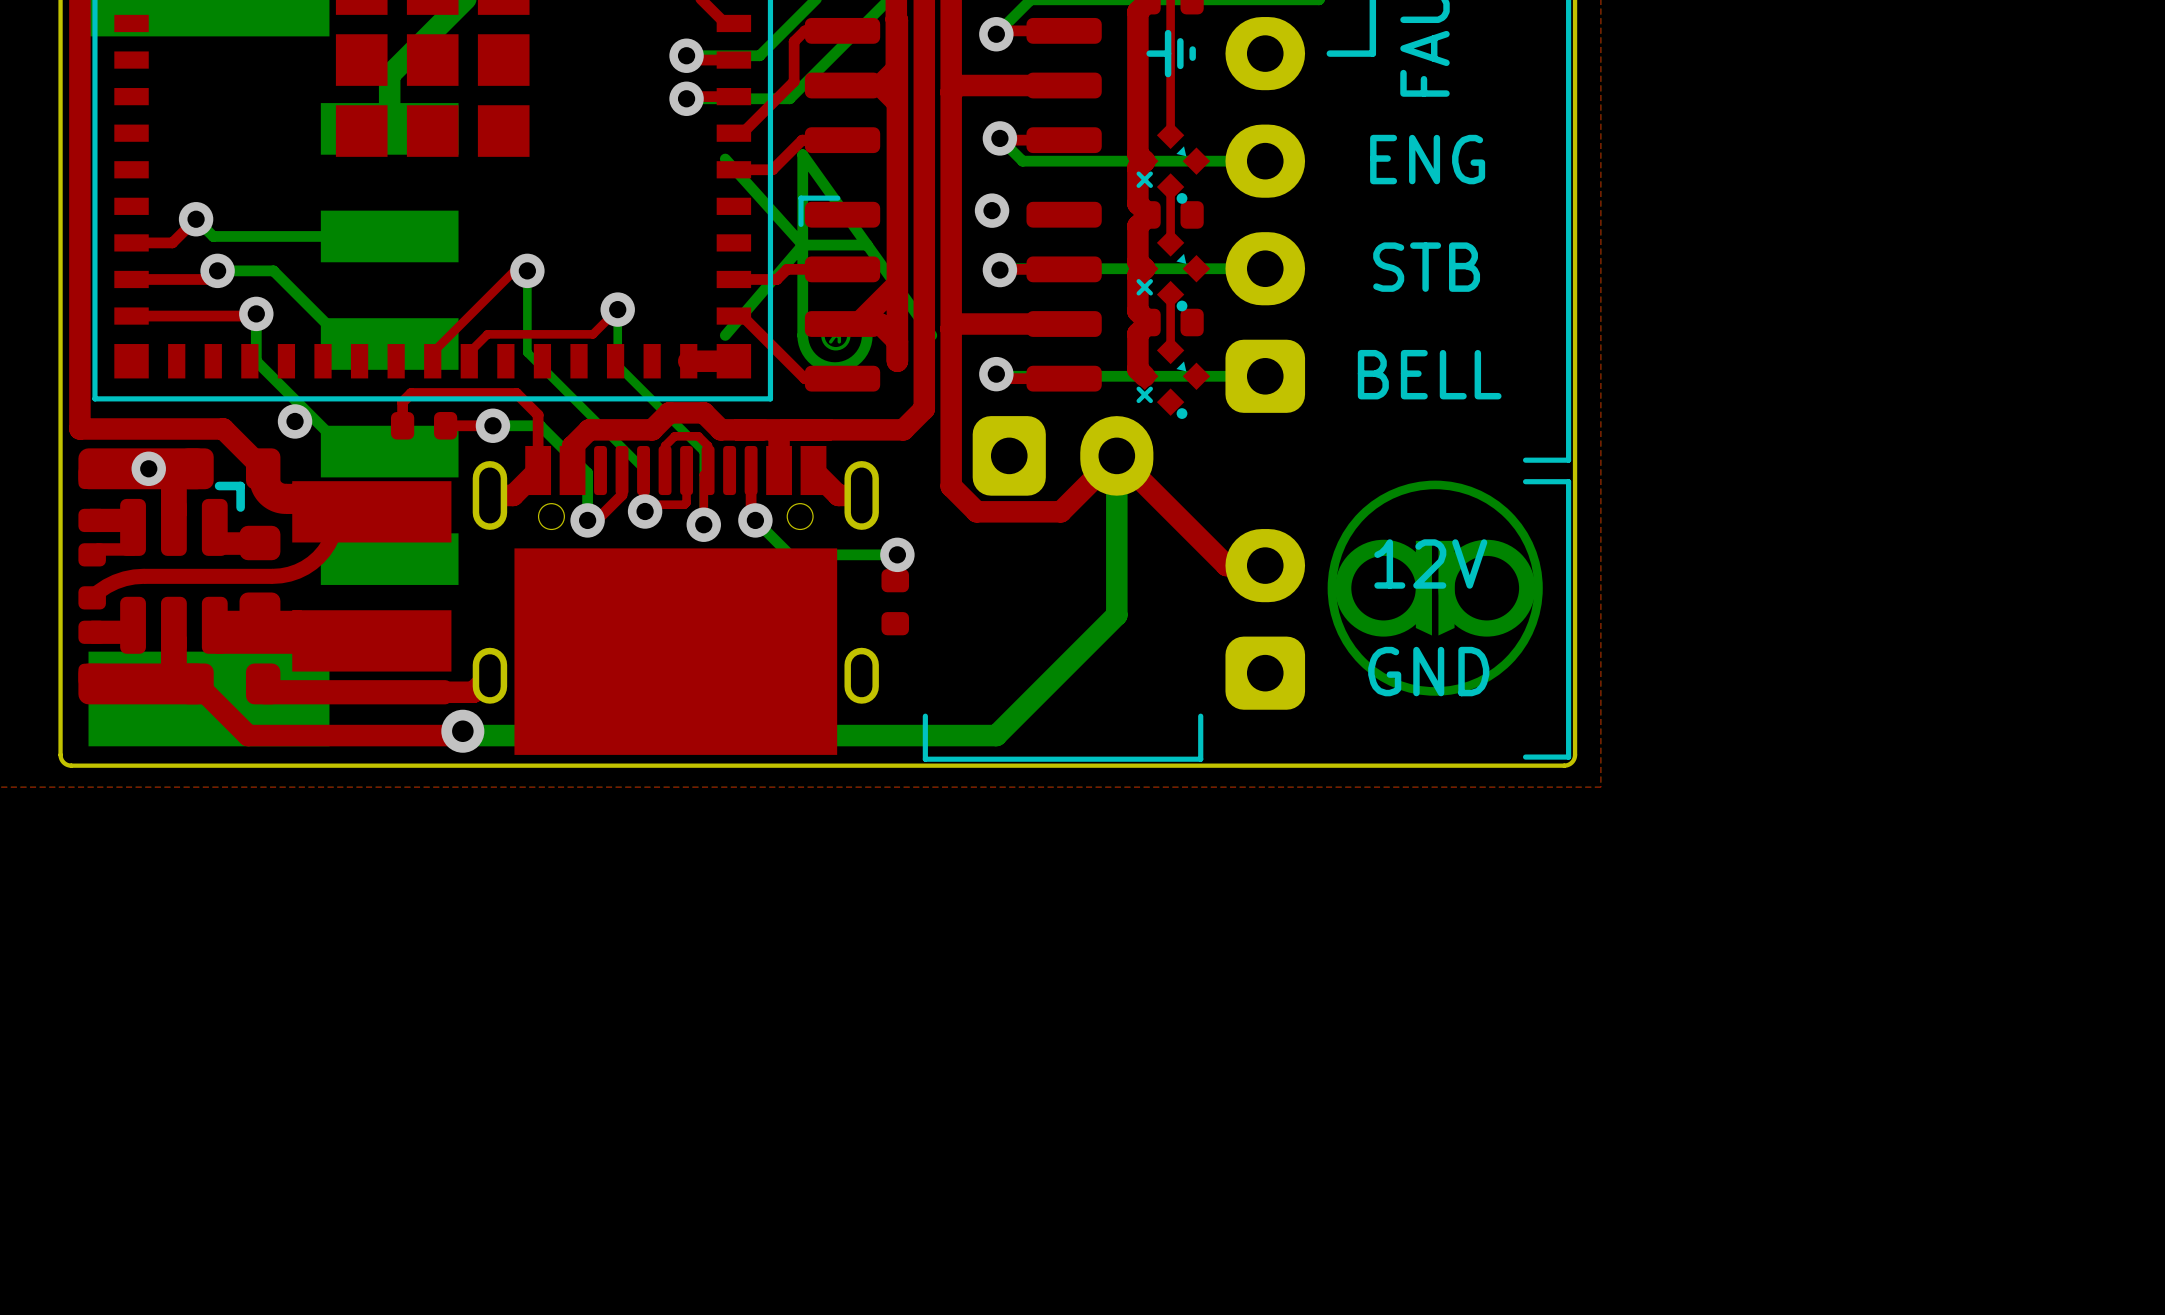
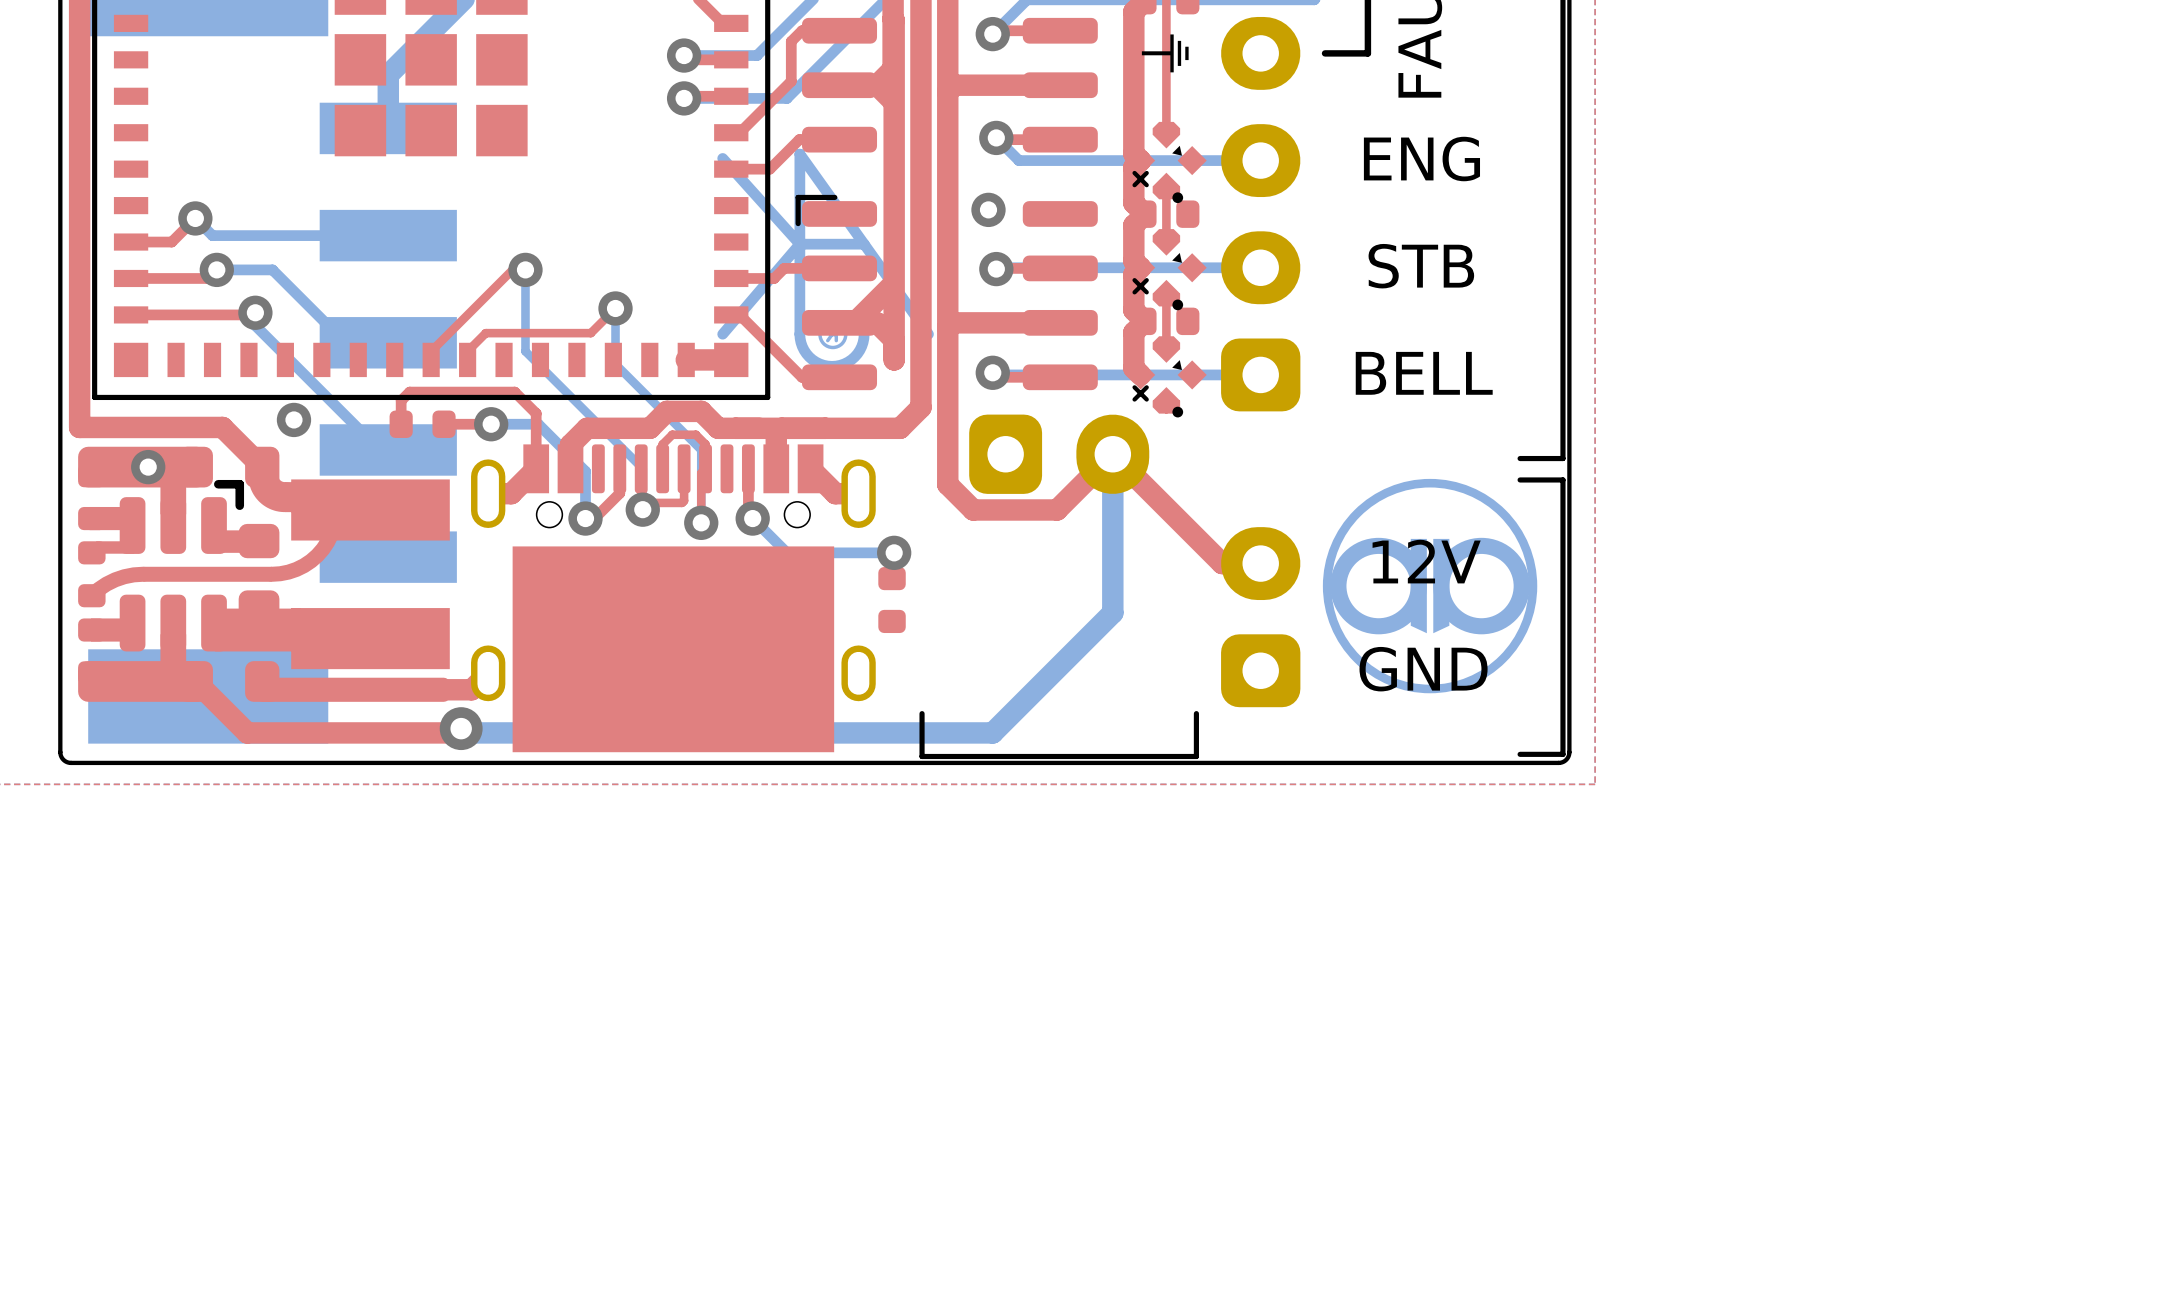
part footprint: [1131, 121, 1211, 204] -> [1126, 121, 1207, 204]
part footprint: [1131, 229, 1211, 312] -> [1126, 229, 1207, 311]
bottom track: (256, 326) (256, 361) (346, 451) -> (255, 325) (379, 449) (388, 449)
part footprint: [1131, 336, 1211, 419] -> [1126, 336, 1207, 418]

